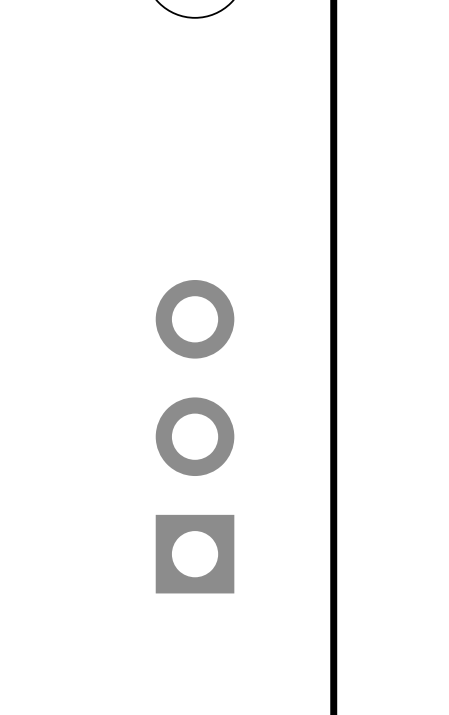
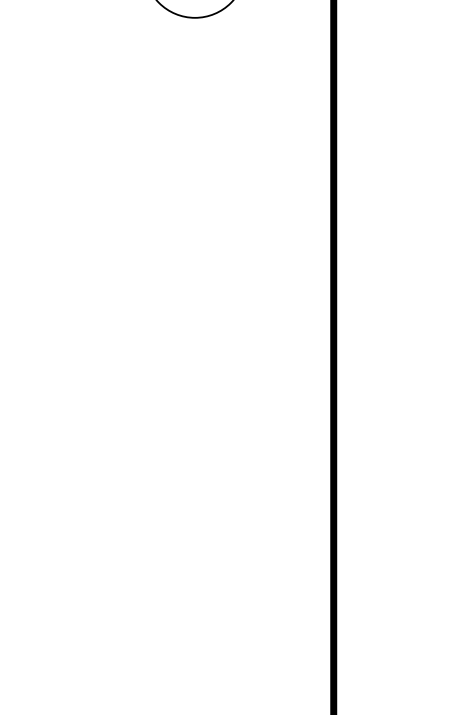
part: (195, 436) -> none

